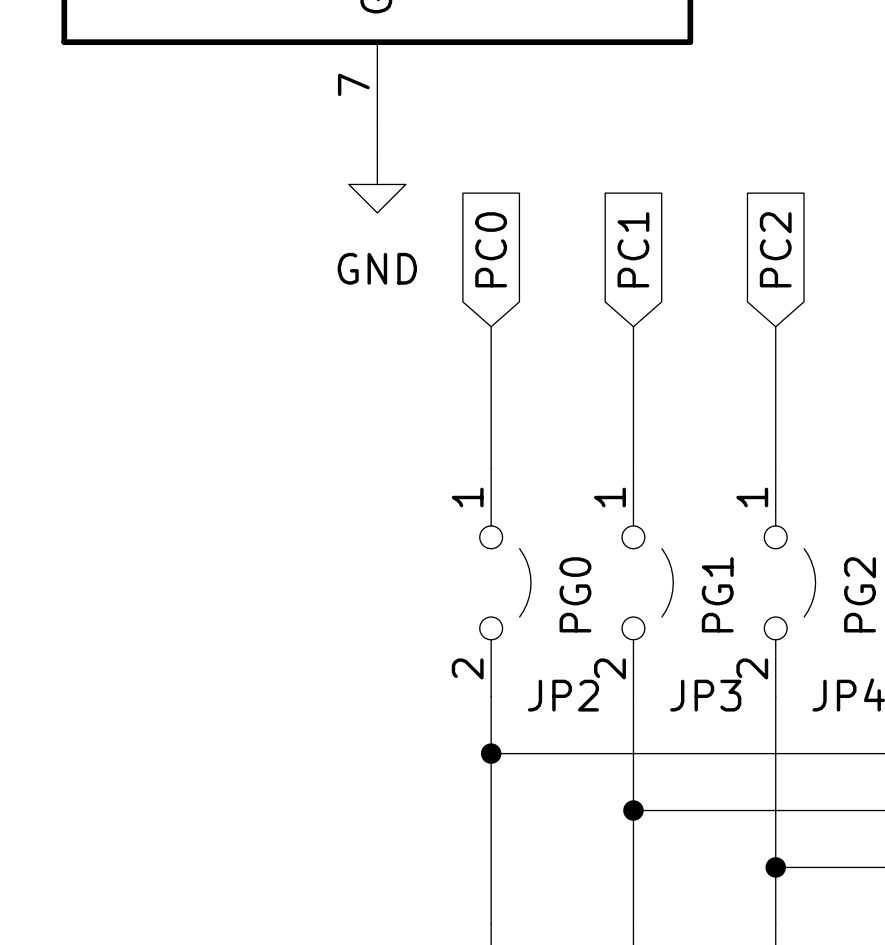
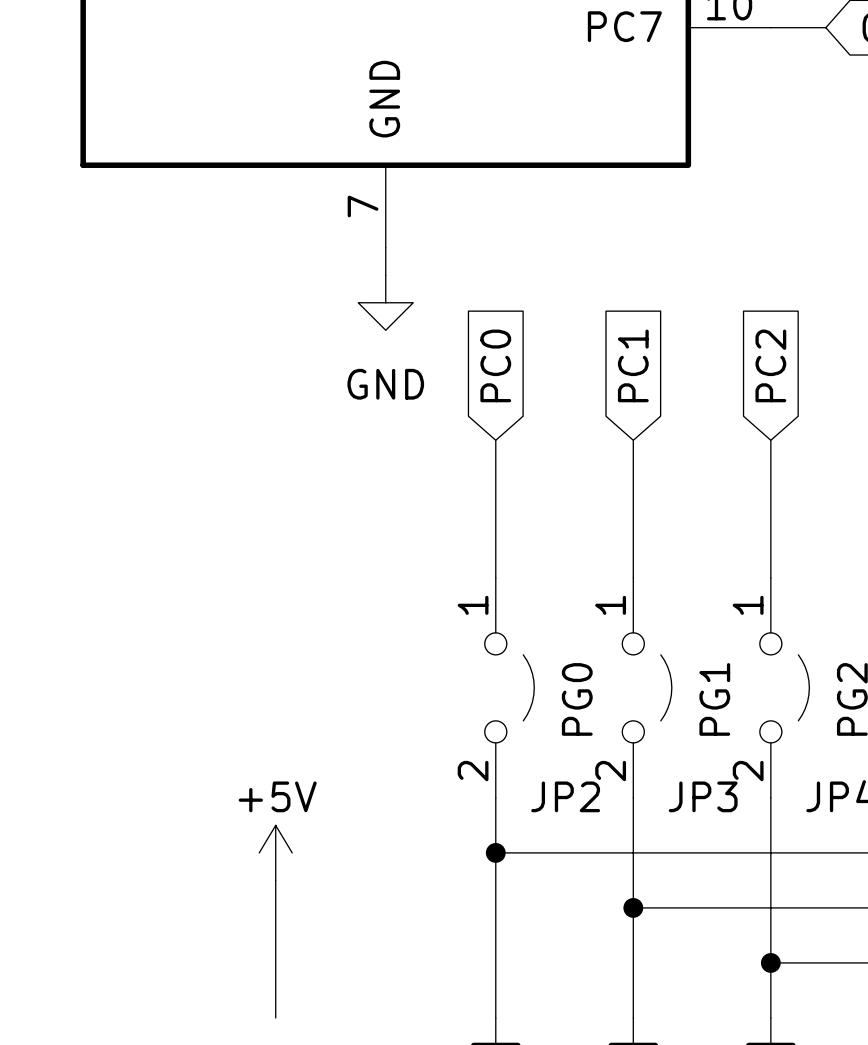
power symbol: none -> +5V (275, 852)
wire: none -> (275, 880) (275, 1017)

